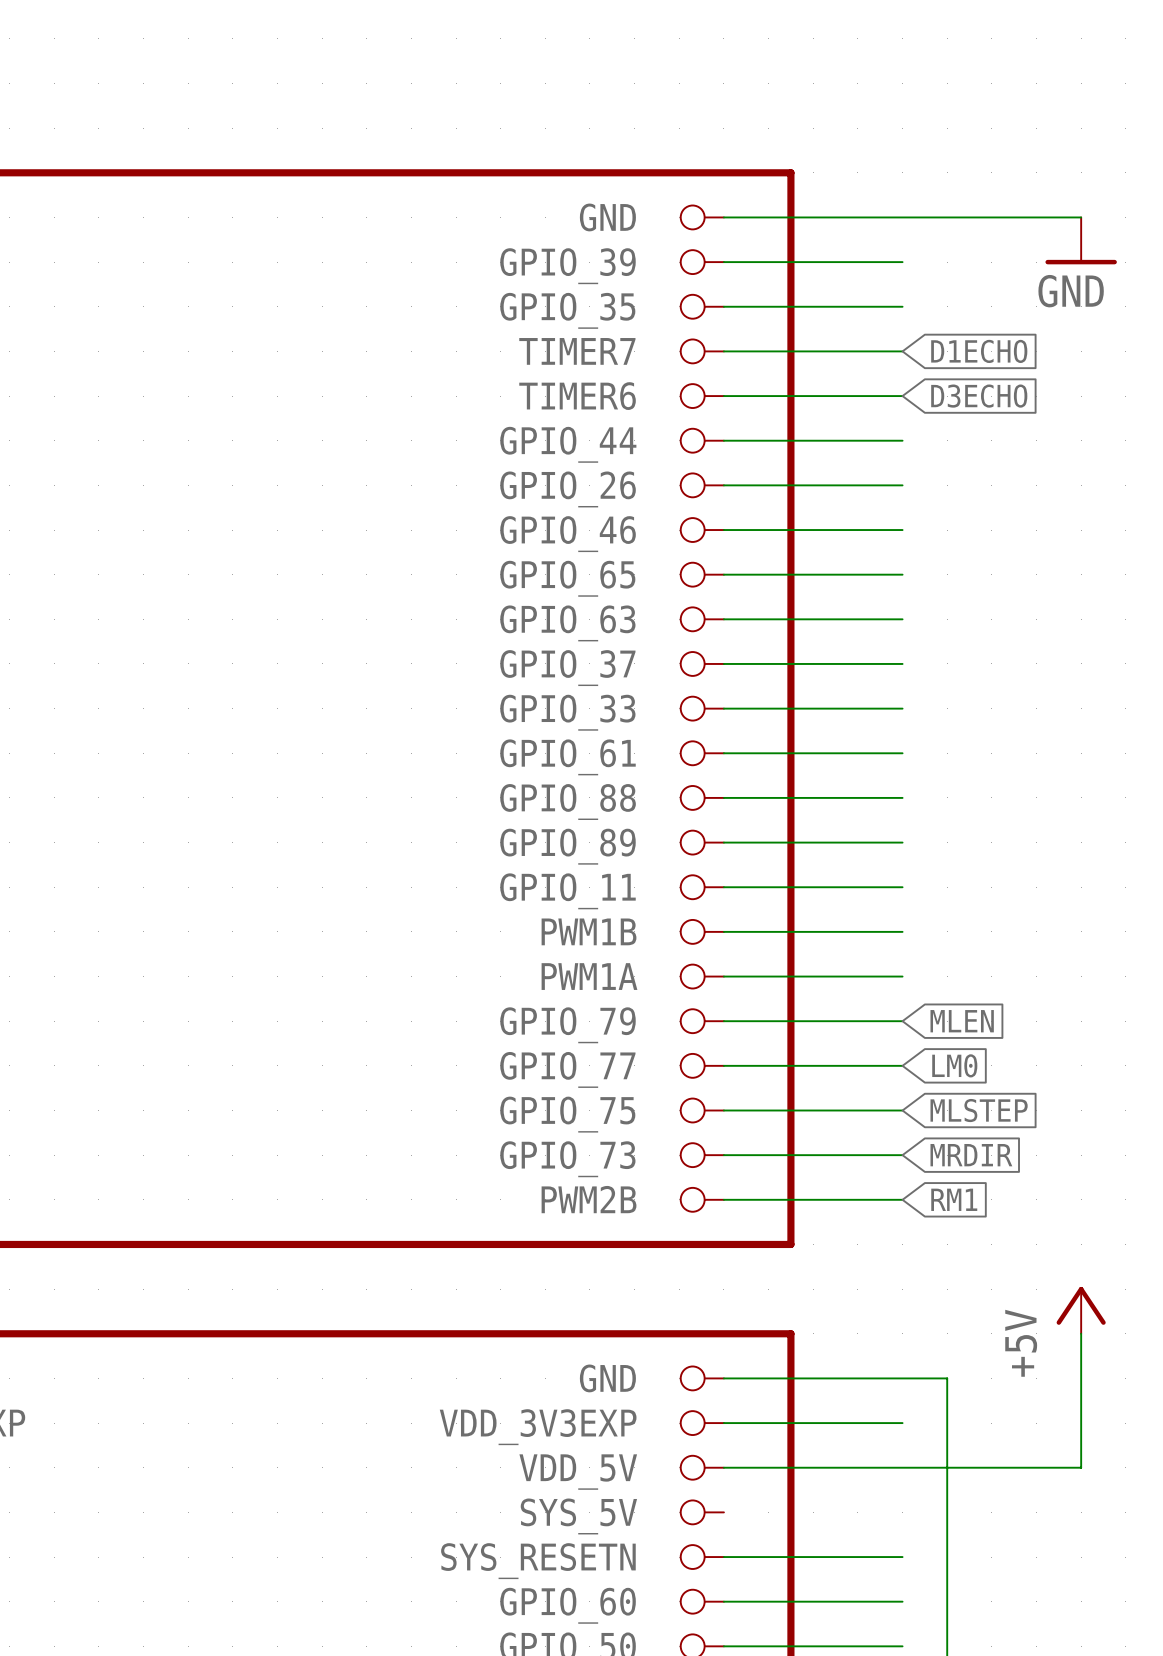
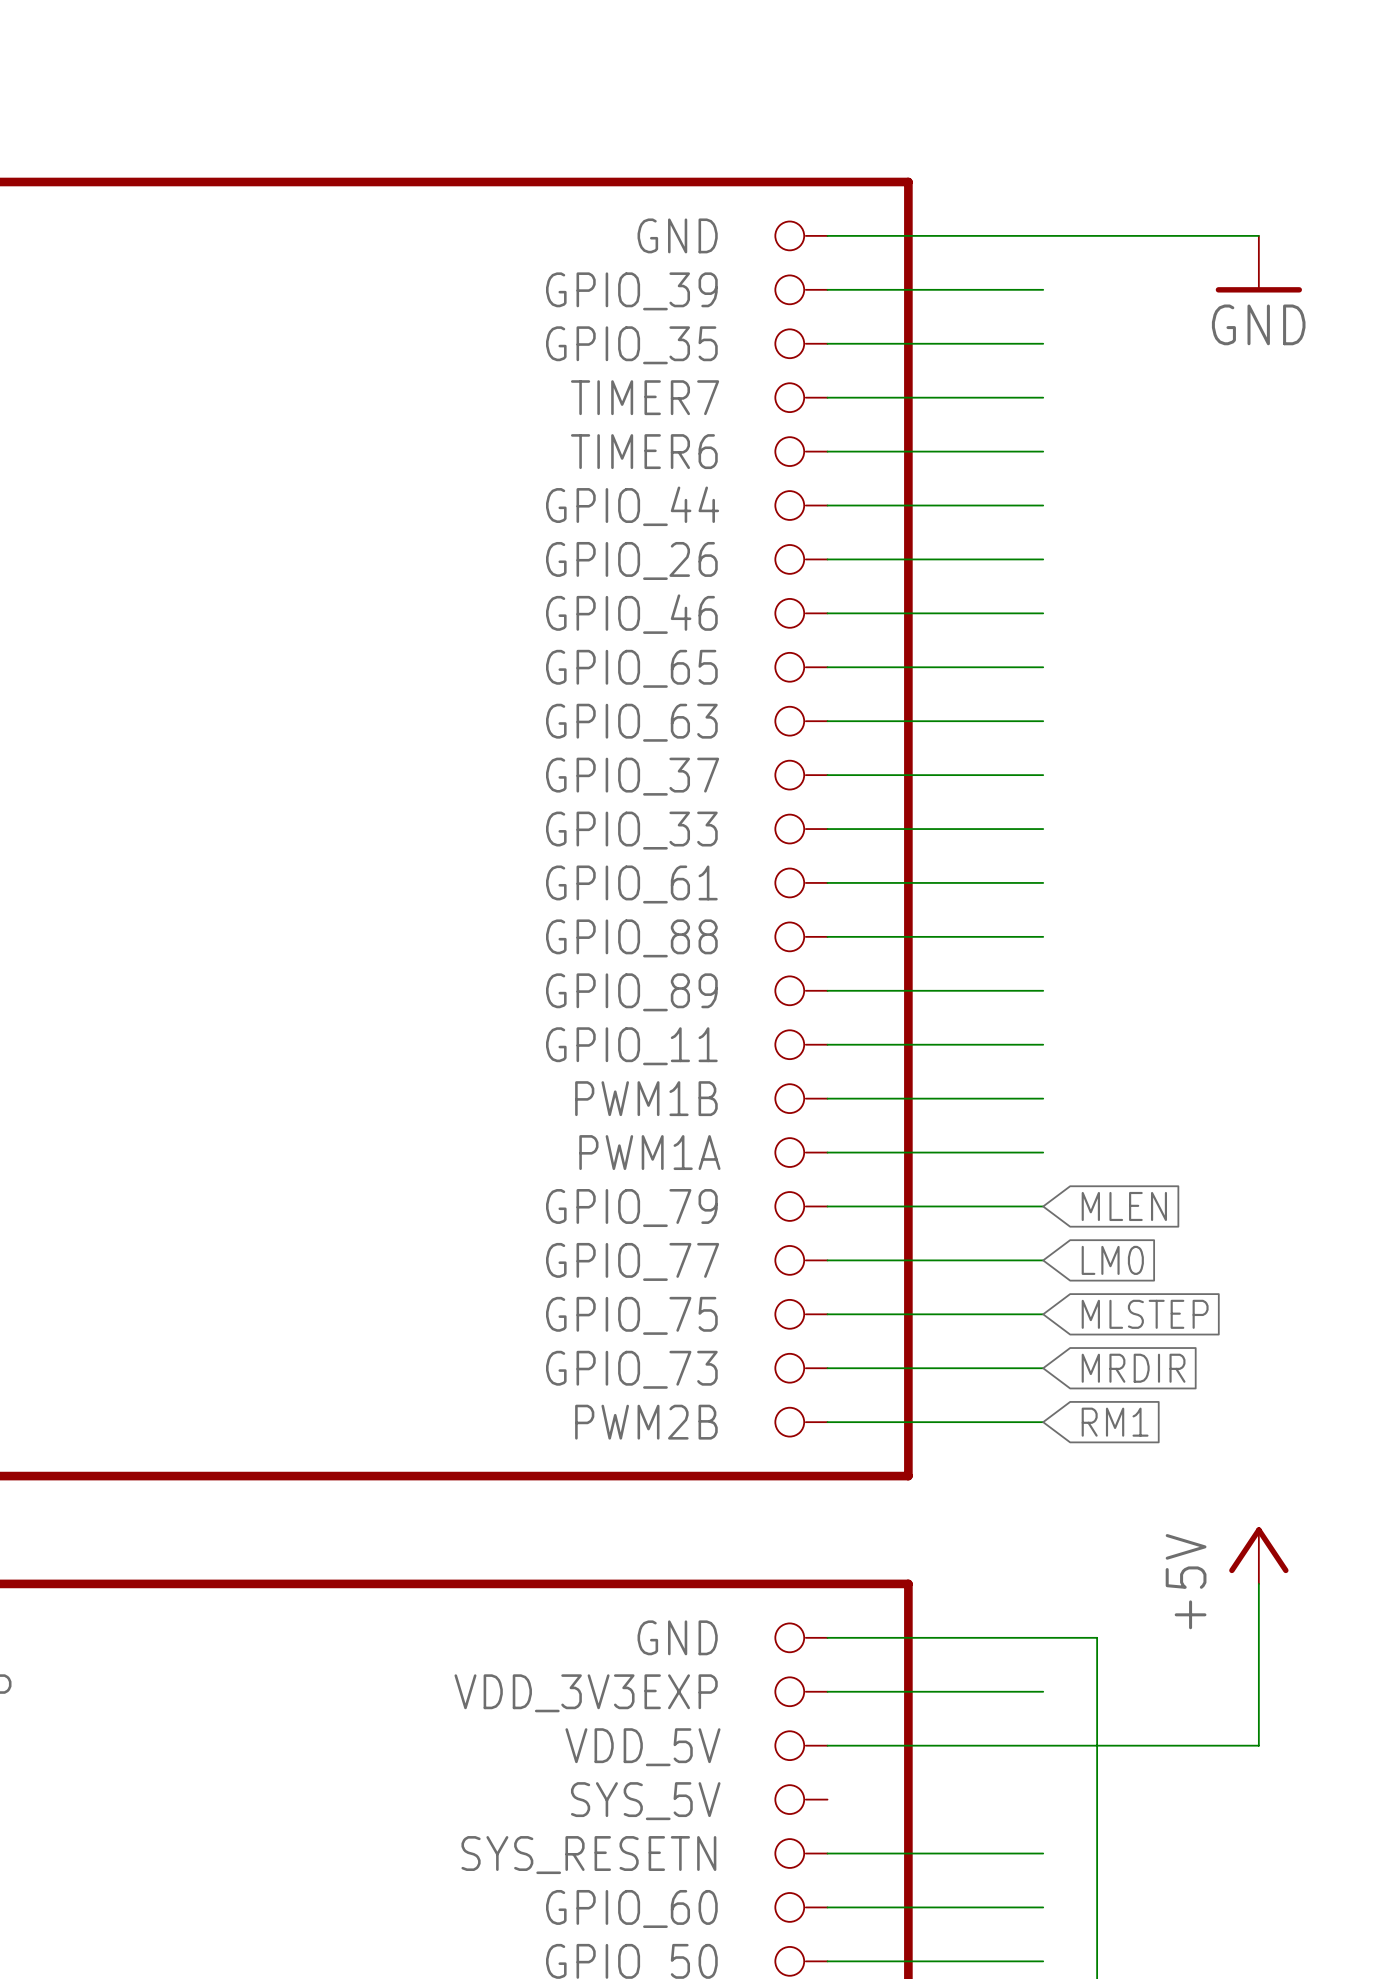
global label: D1ECHO (979, 351) -> none
global label: D3ECHO (979, 396) -> none

